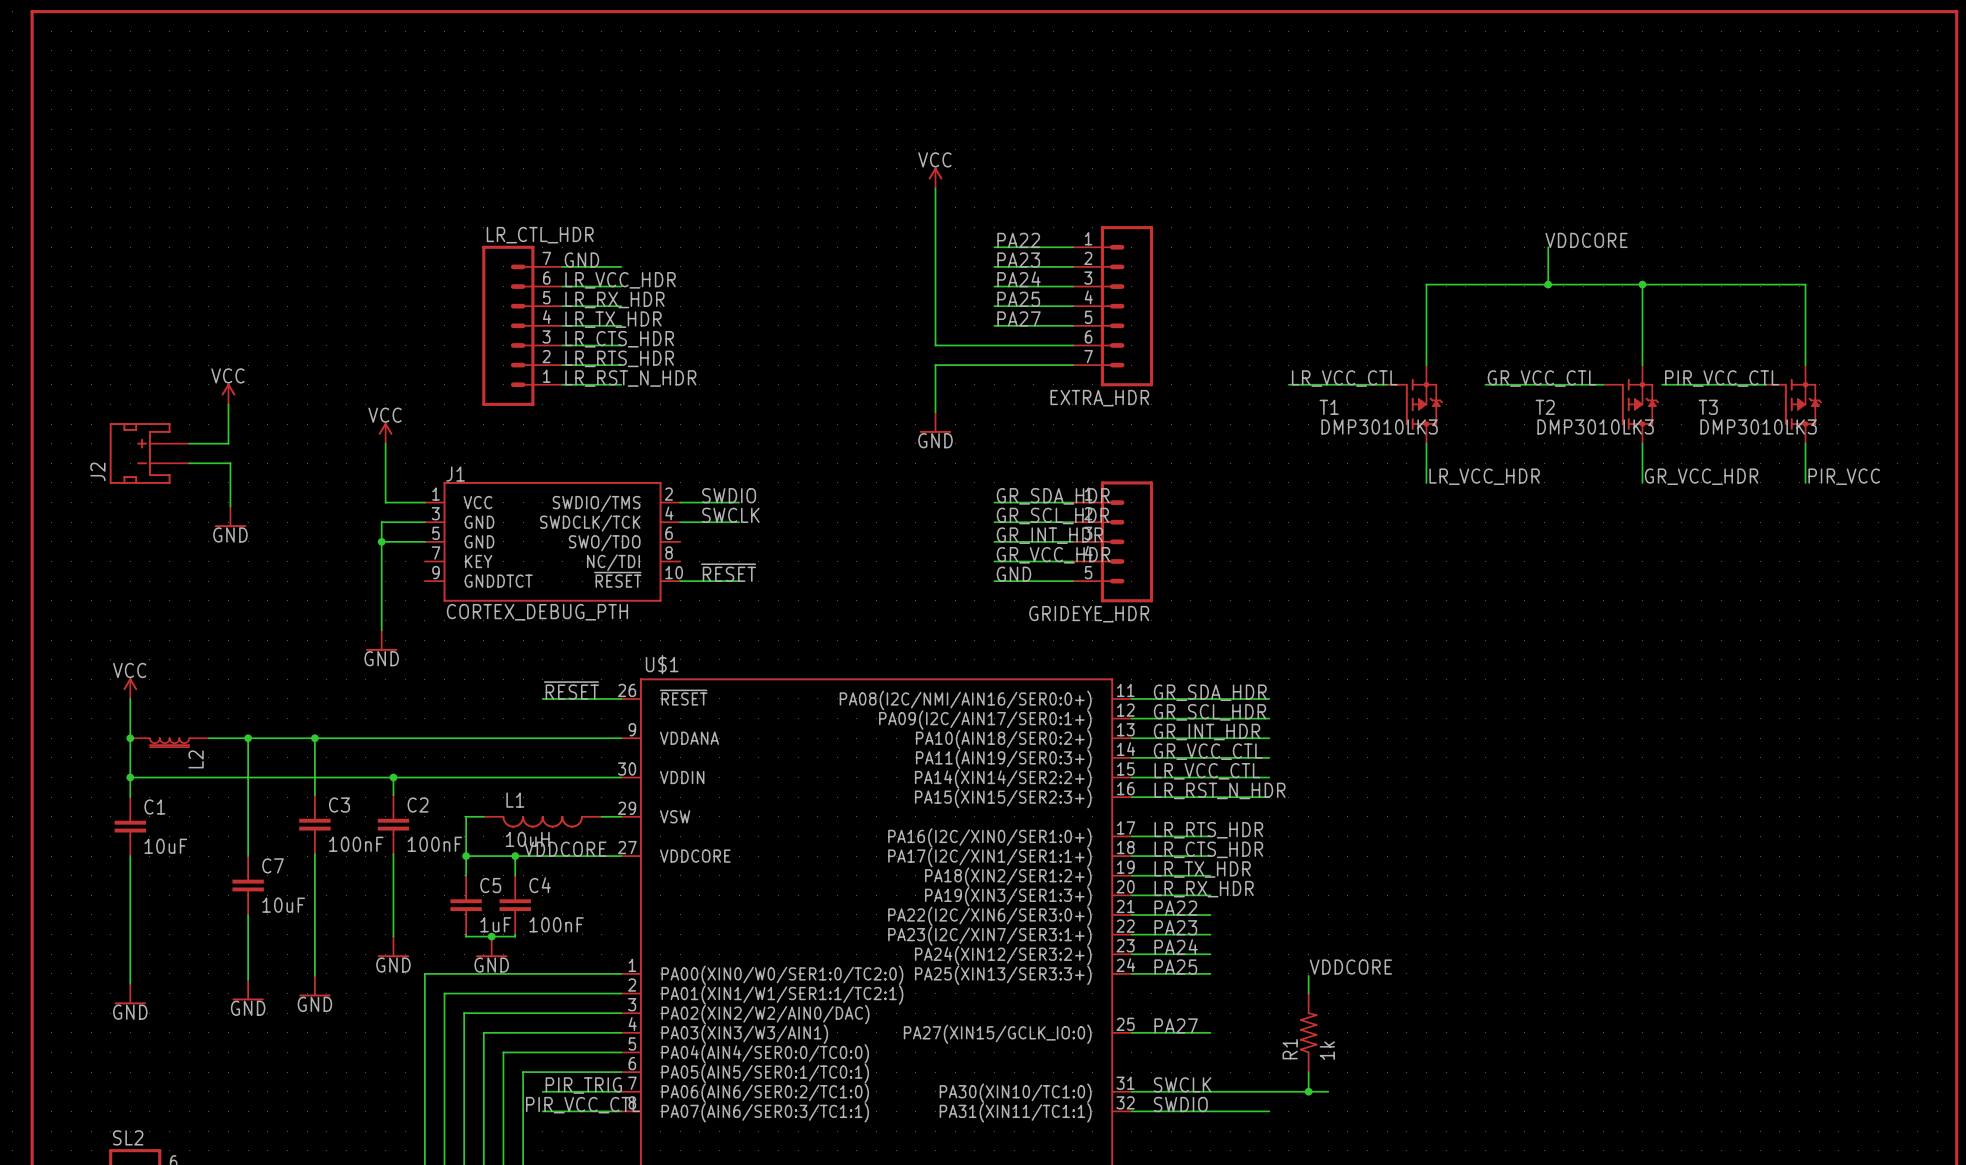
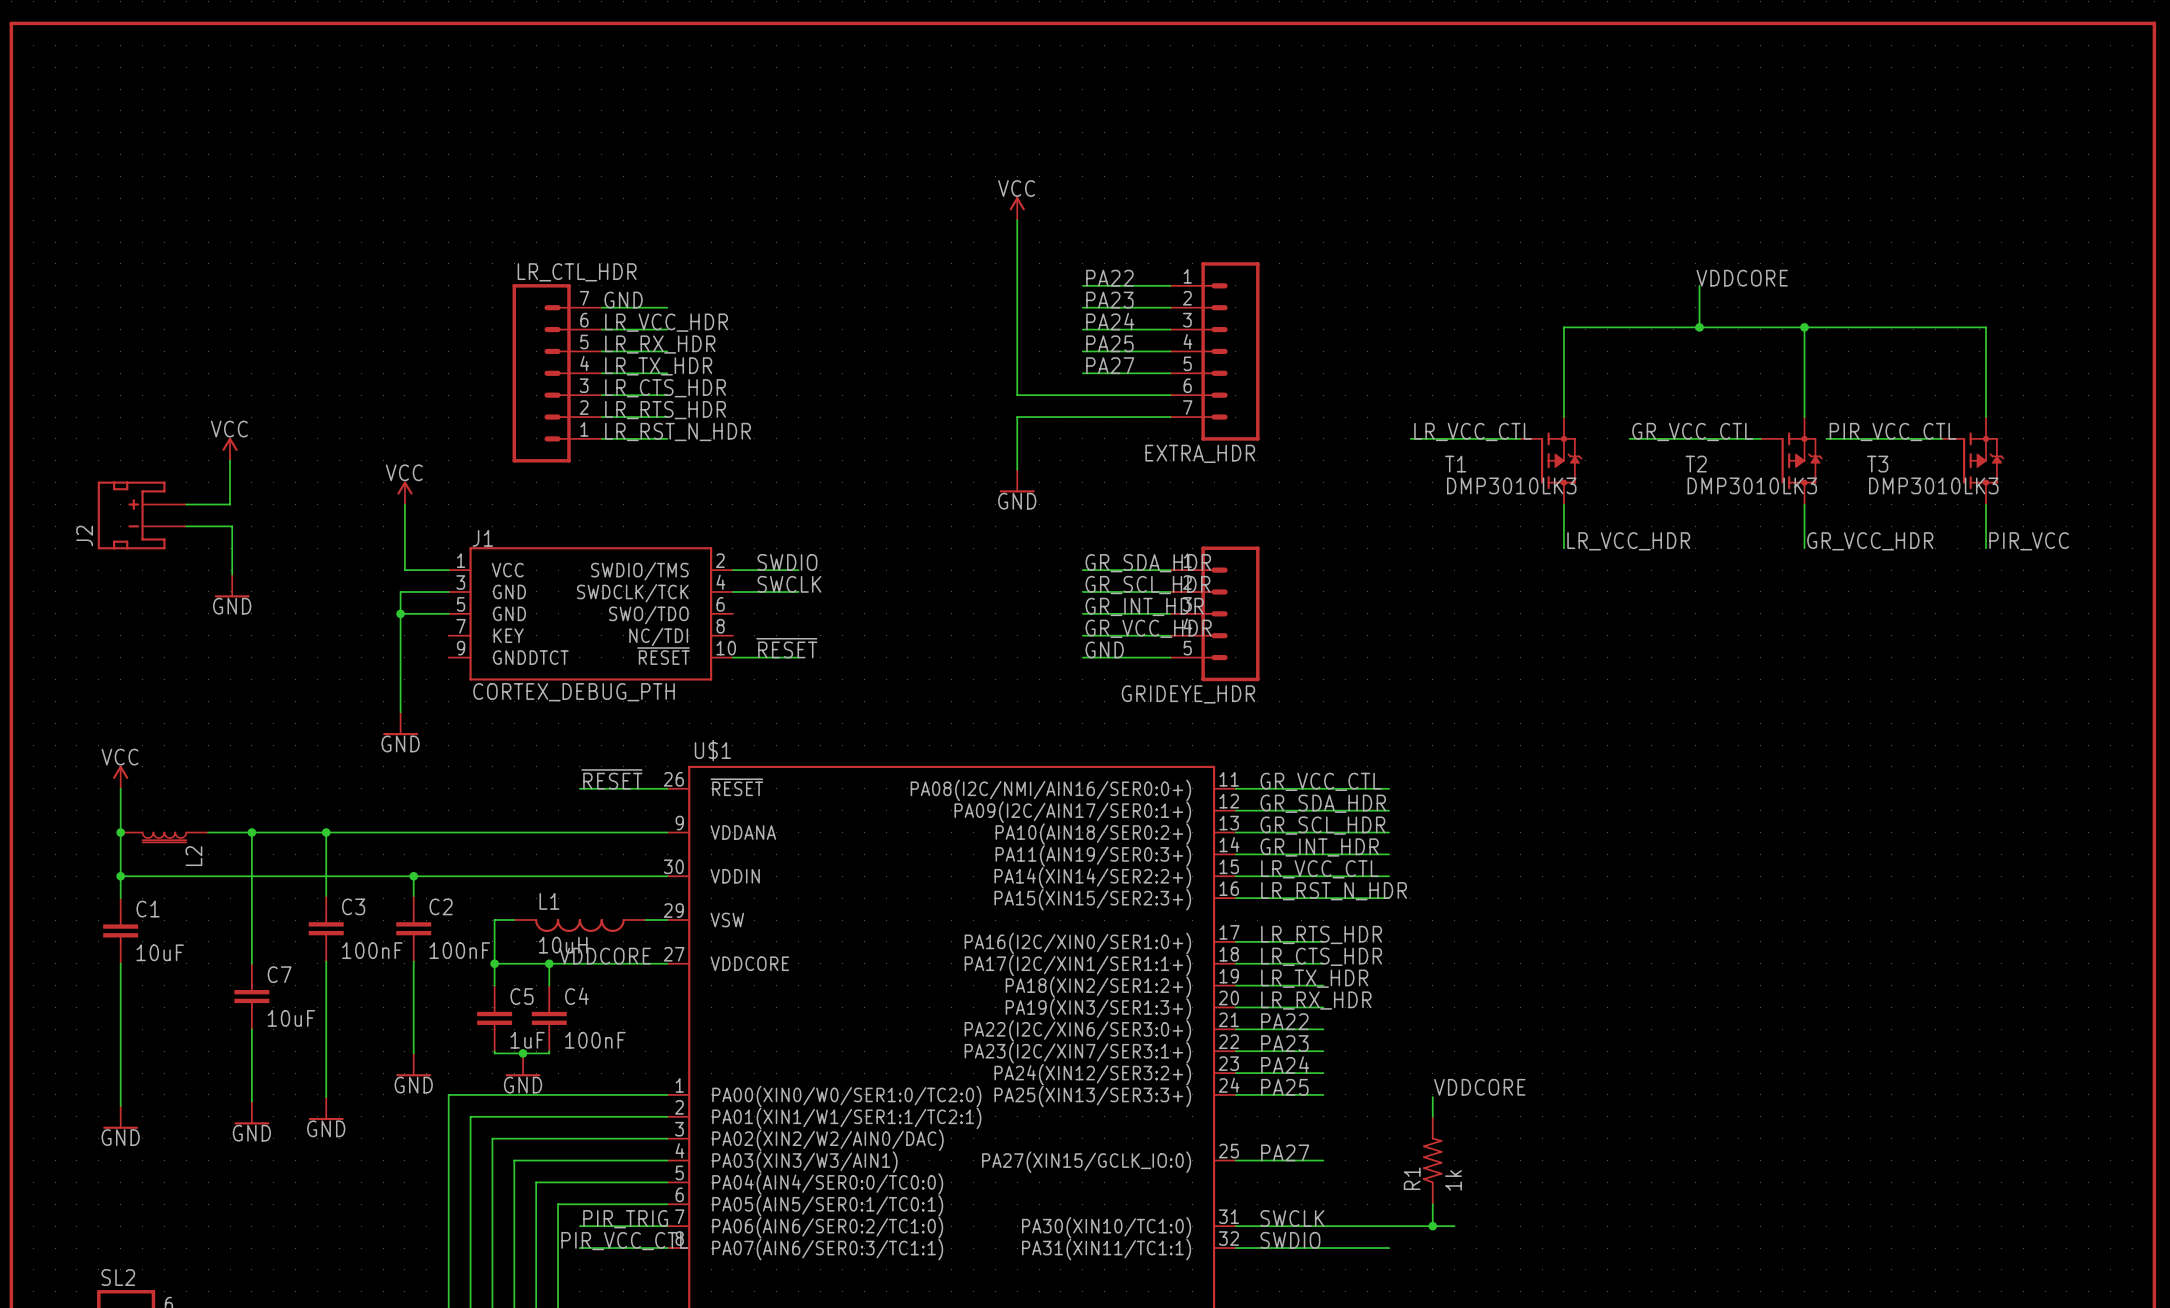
label: GR_SDA_HDR (1210, 692) -> GR_VCC_CTL (1320, 781)
label: GR_SCL_HDR (1209, 712) -> GR_SDA_HDR (1323, 803)
label: GR_INT_HDR (1207, 732) -> GR_SCL_HDR (1322, 825)
label: GR_VCC_CTL (1208, 751) -> GR_INT_HDR (1319, 847)

